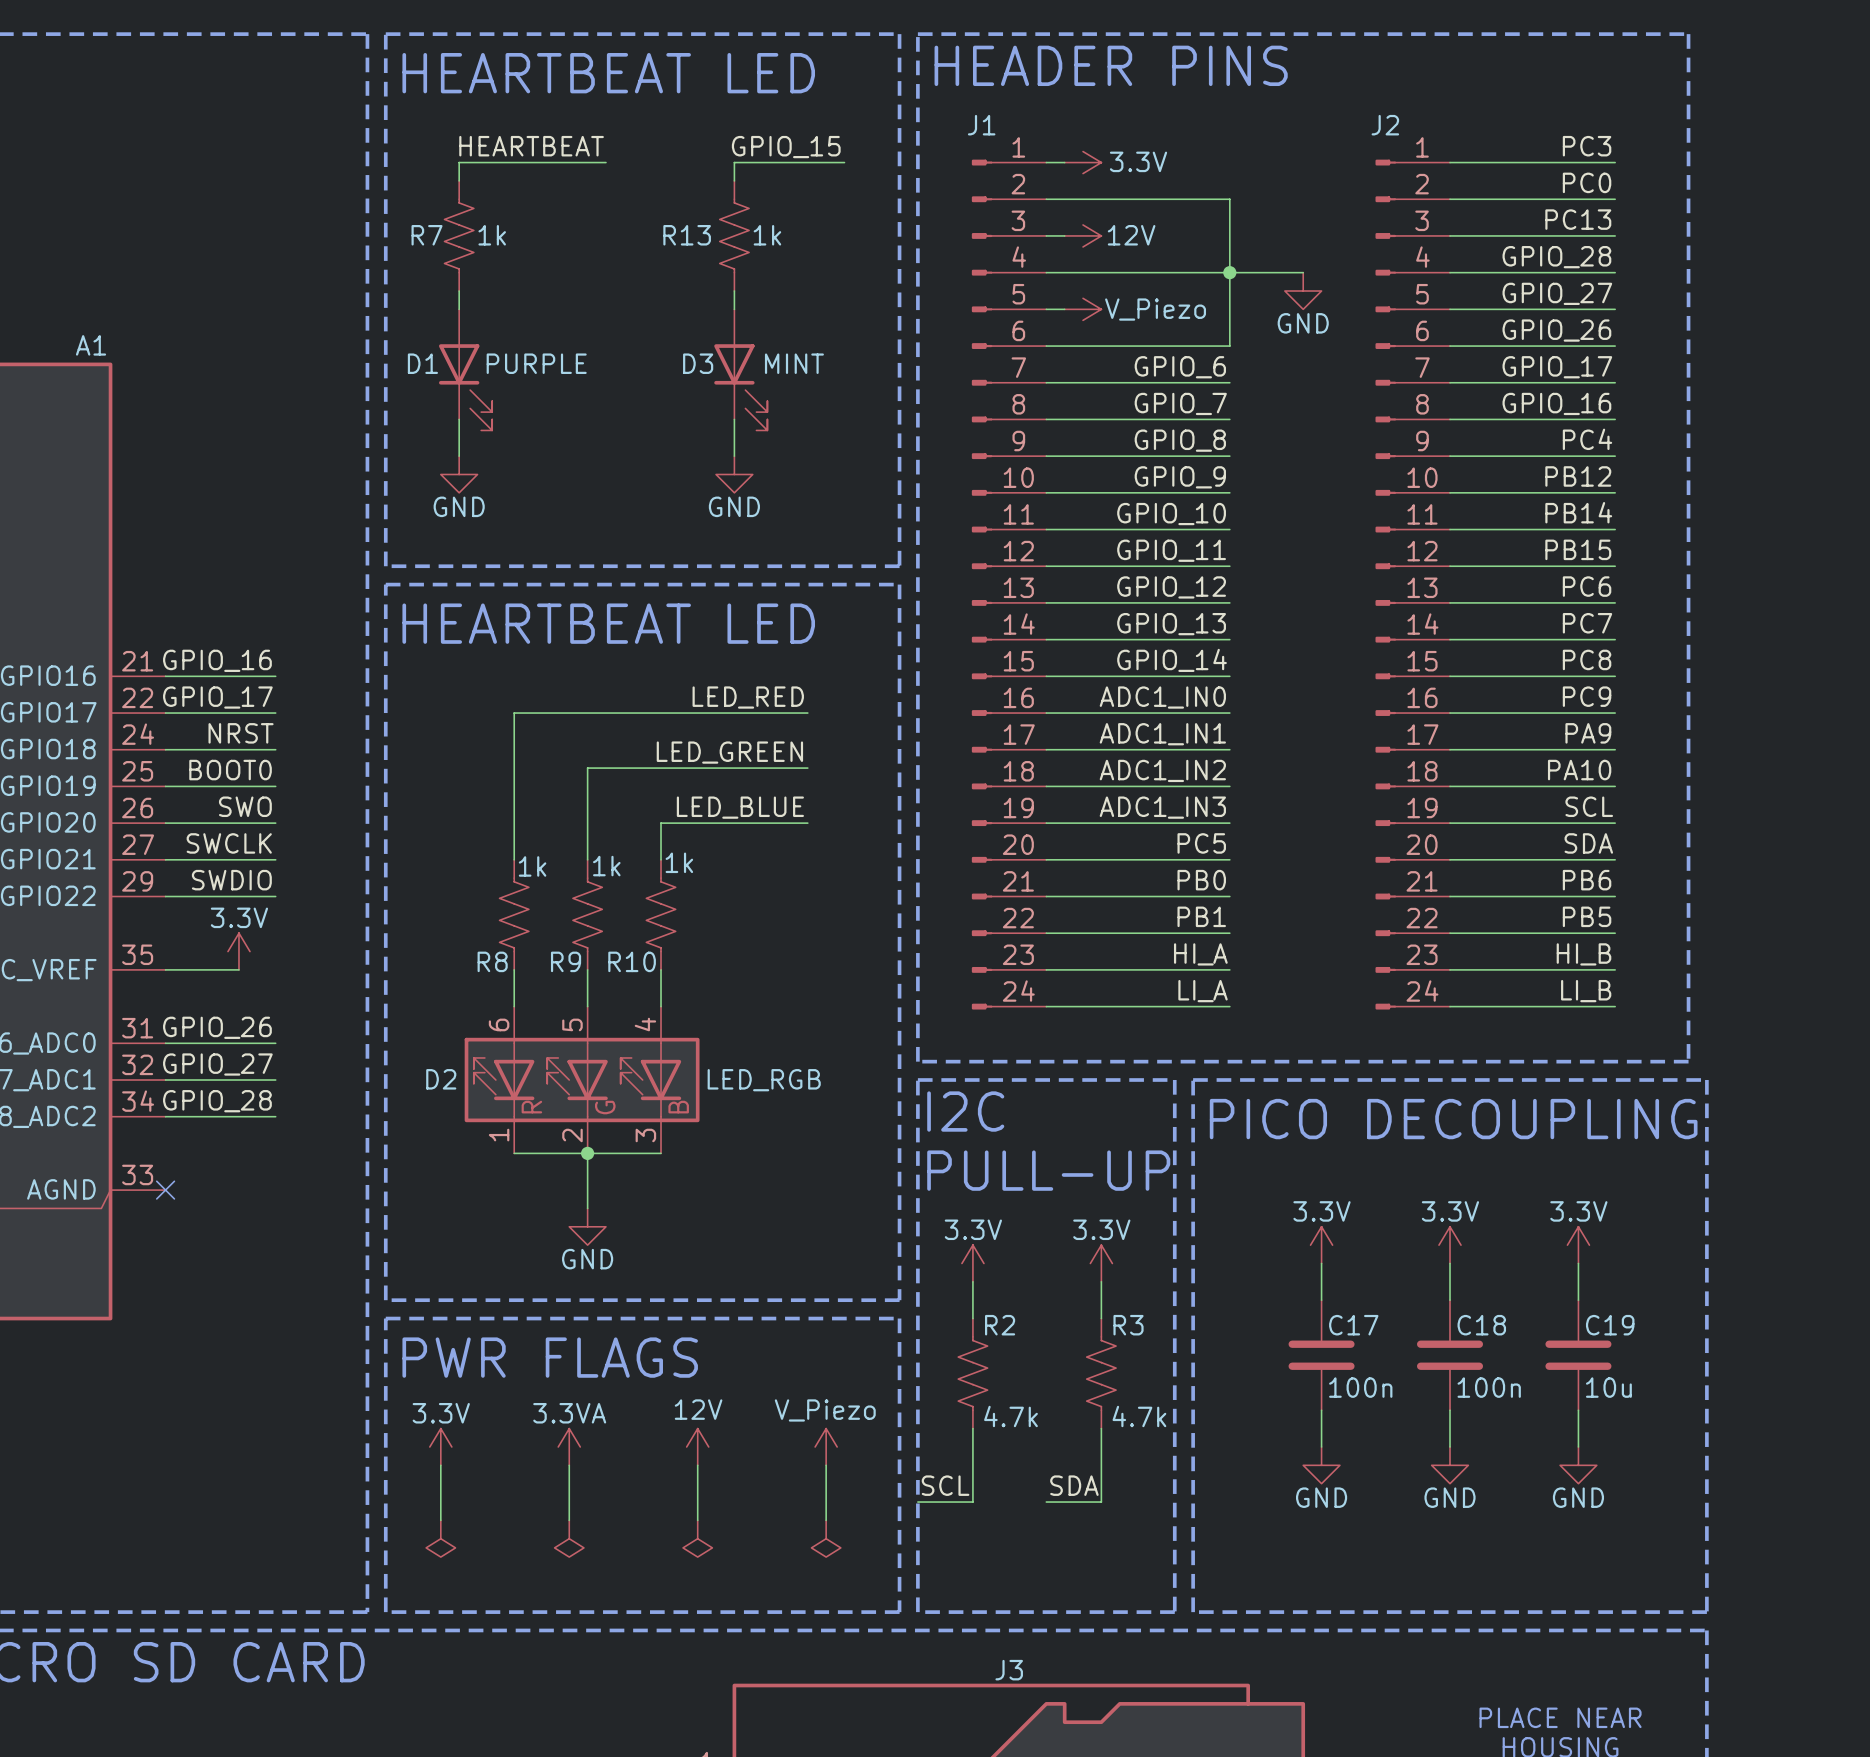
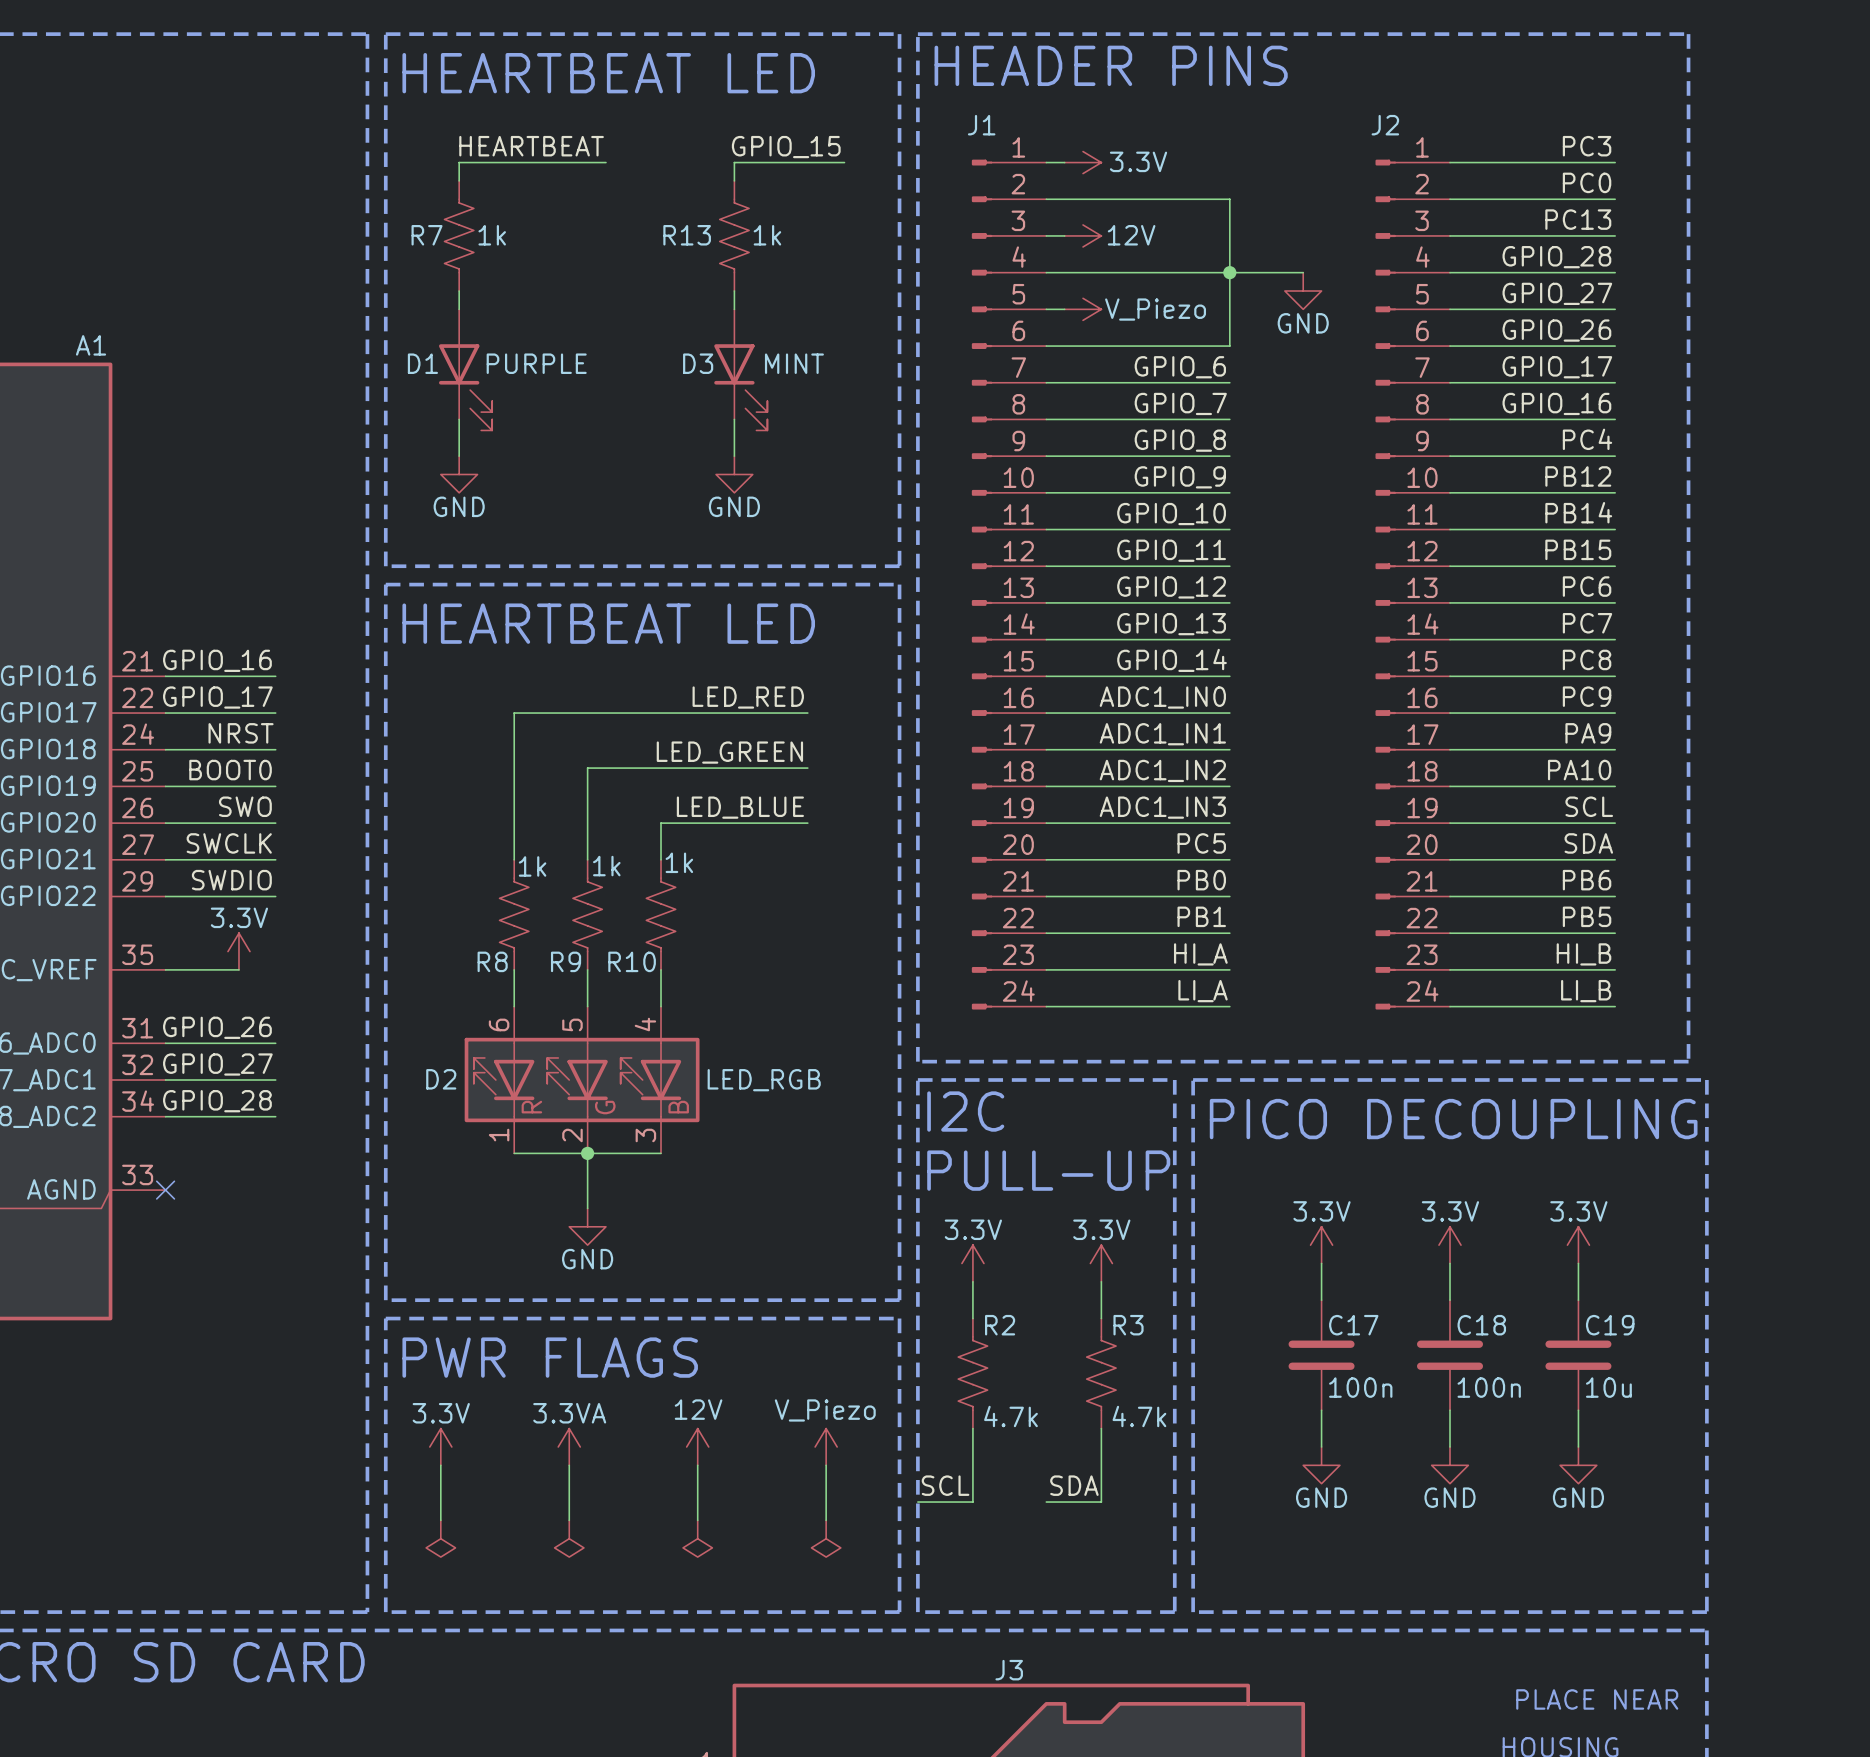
text position: PLACE NEAR (1560, 1717) -> PLACE NEAR (1597, 1699)

